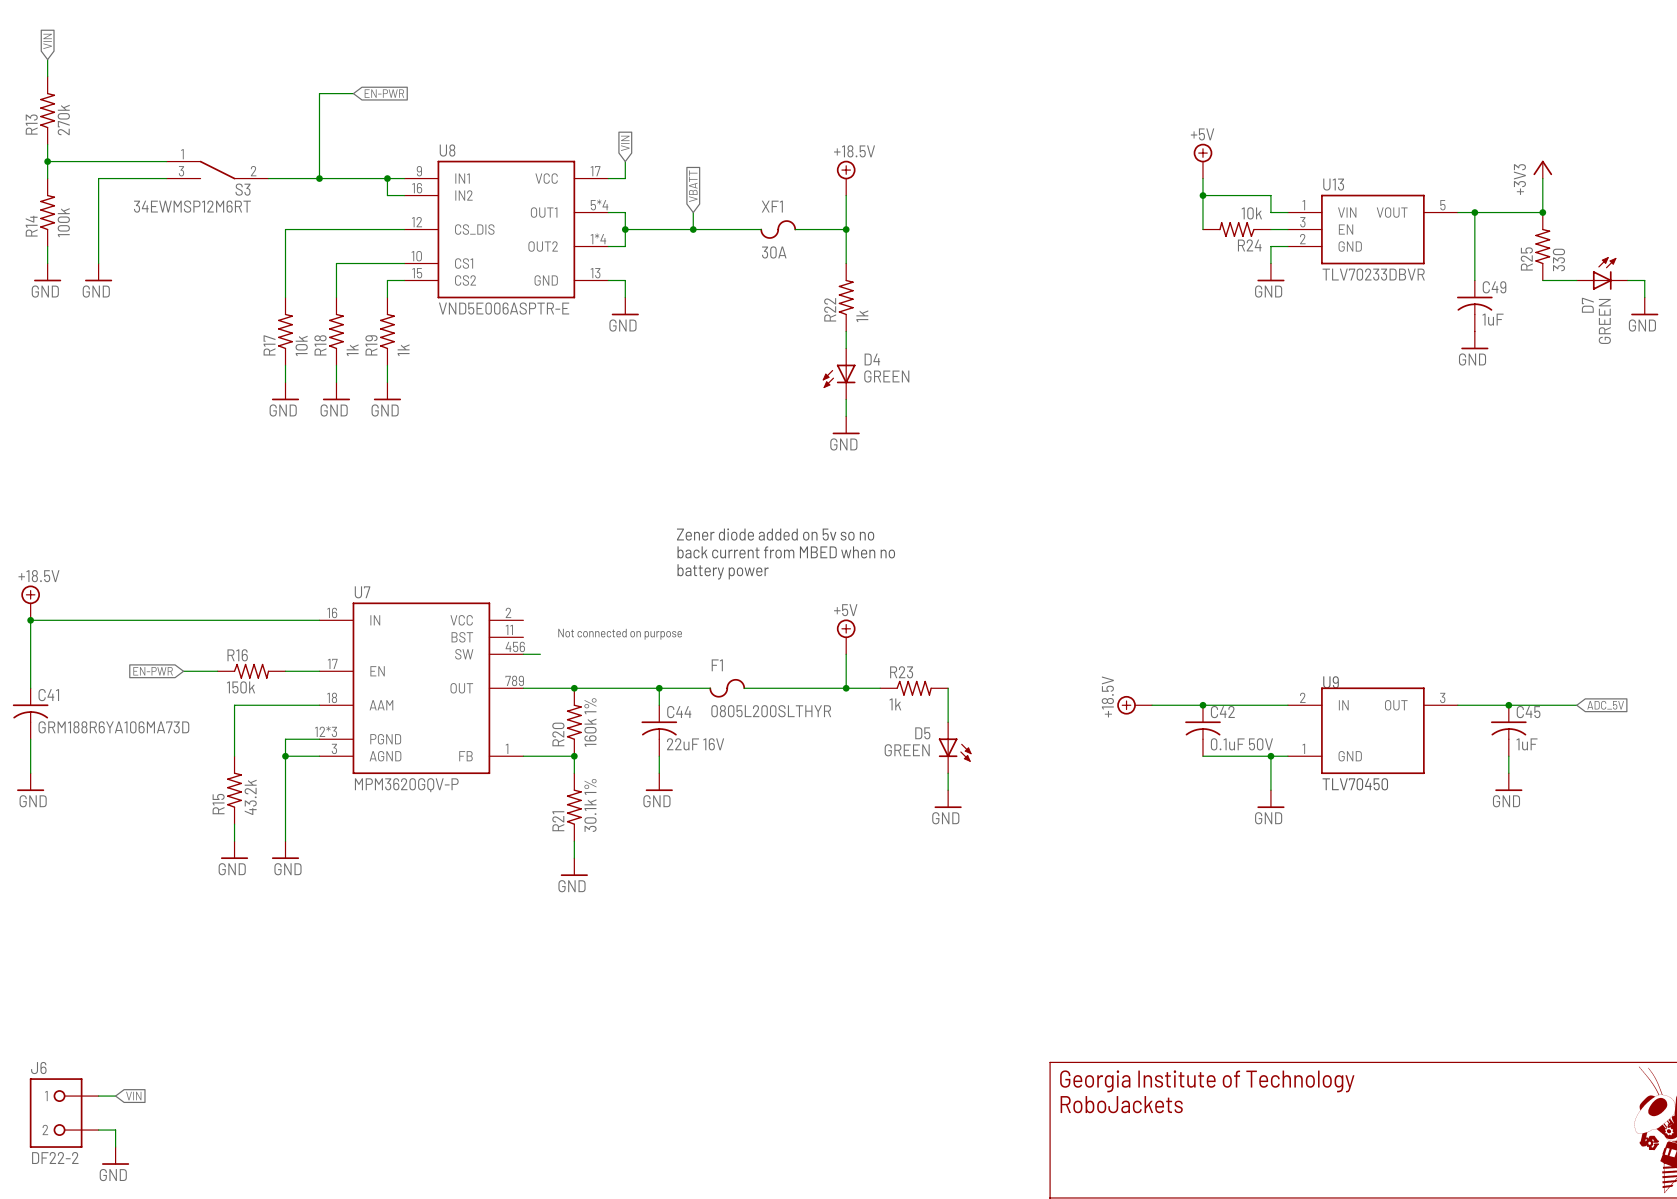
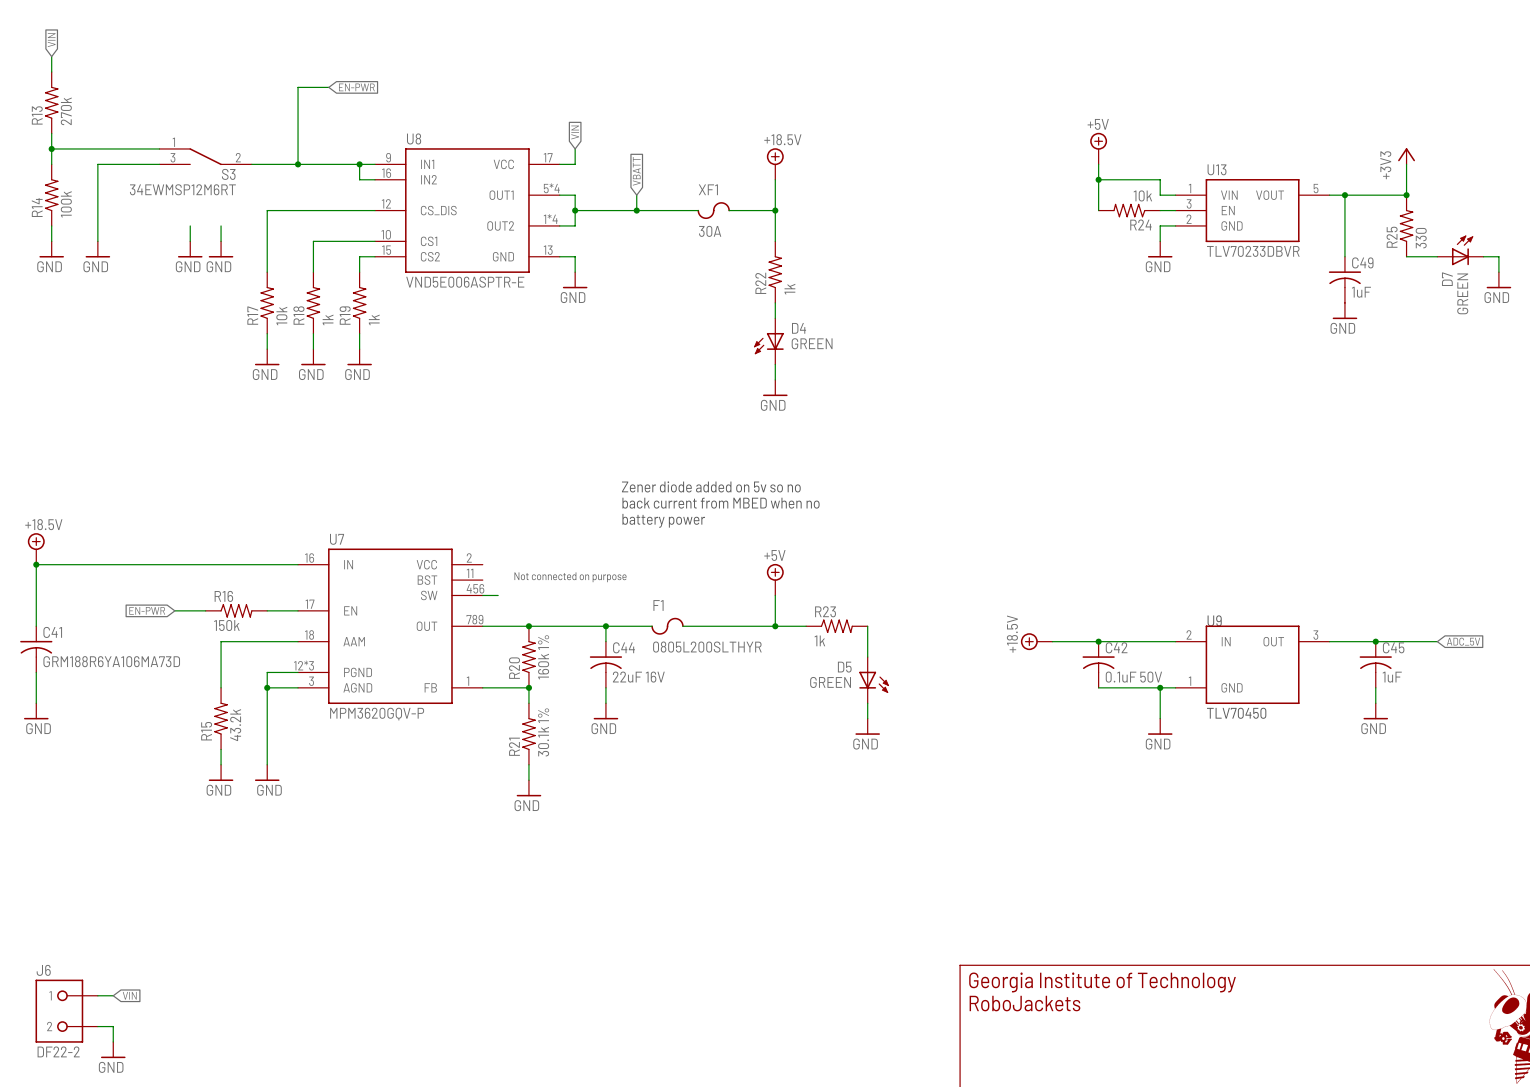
wire: none -> (190, 225) (190, 241)
wire: none -> (221, 225) (221, 241)
power symbol: none -> GND (190, 249)
power symbol: none -> GND (221, 249)

